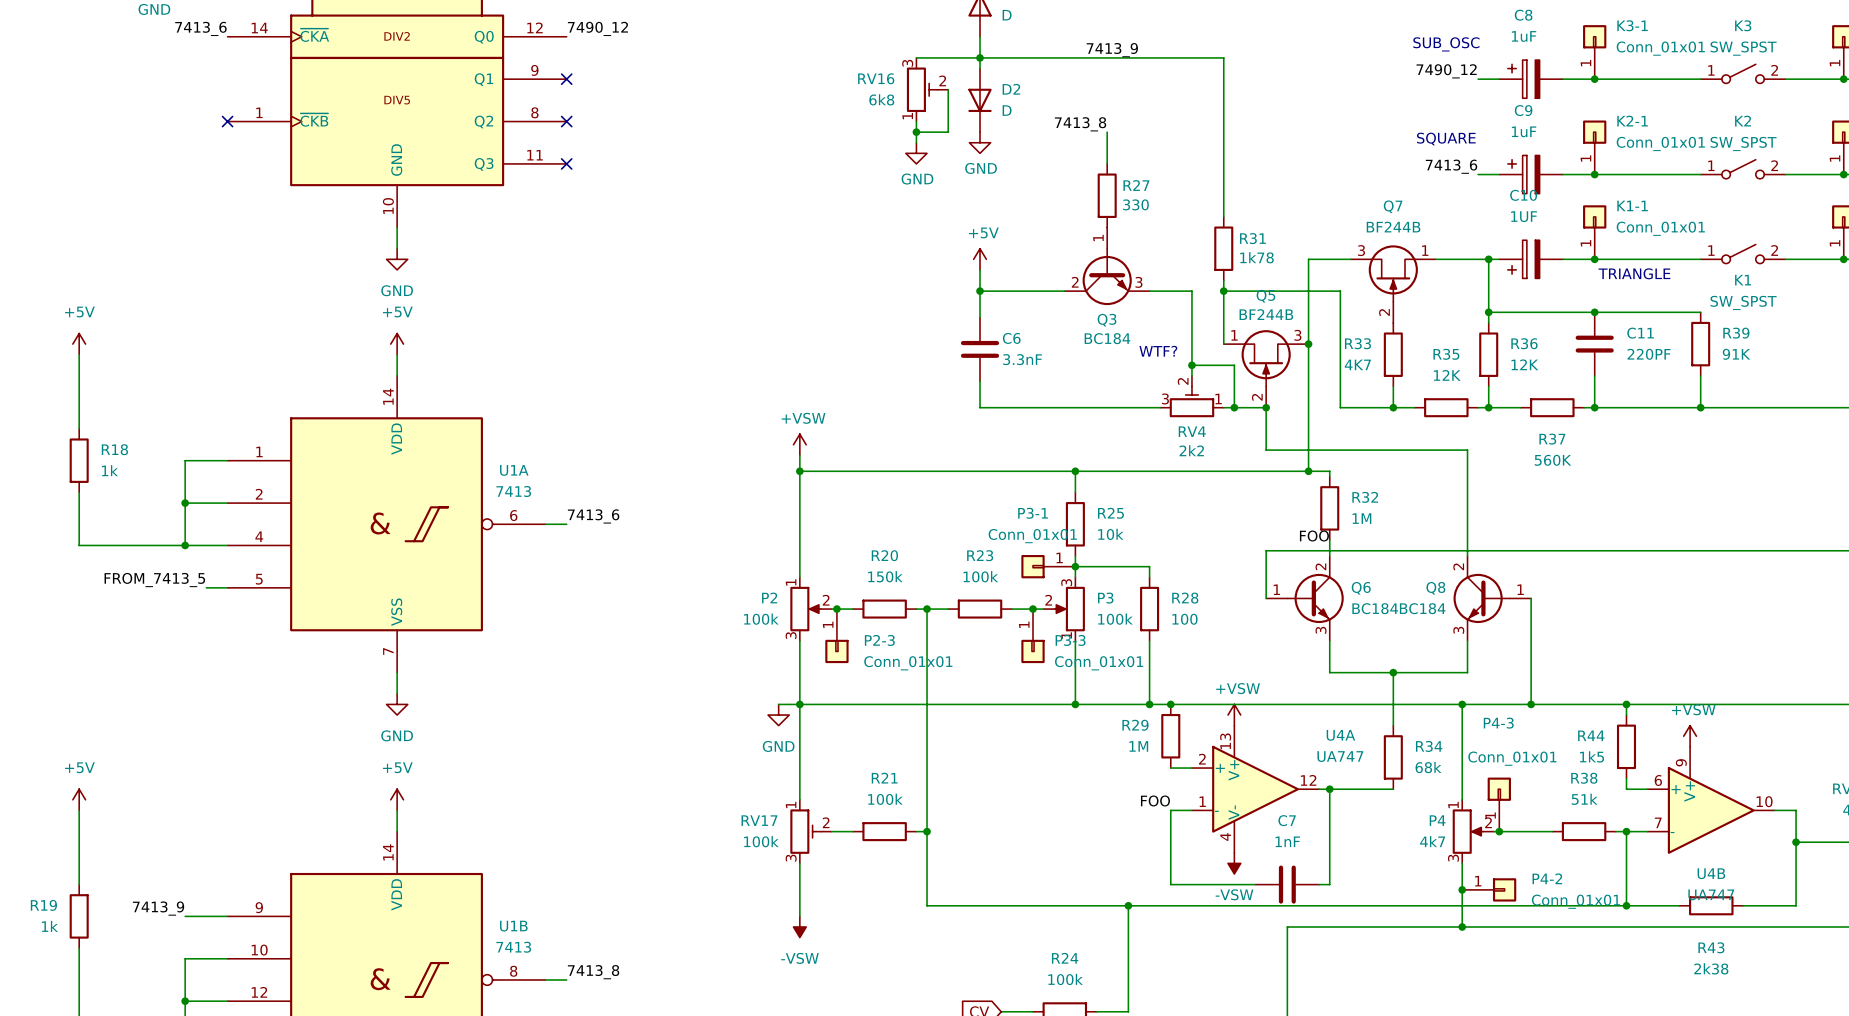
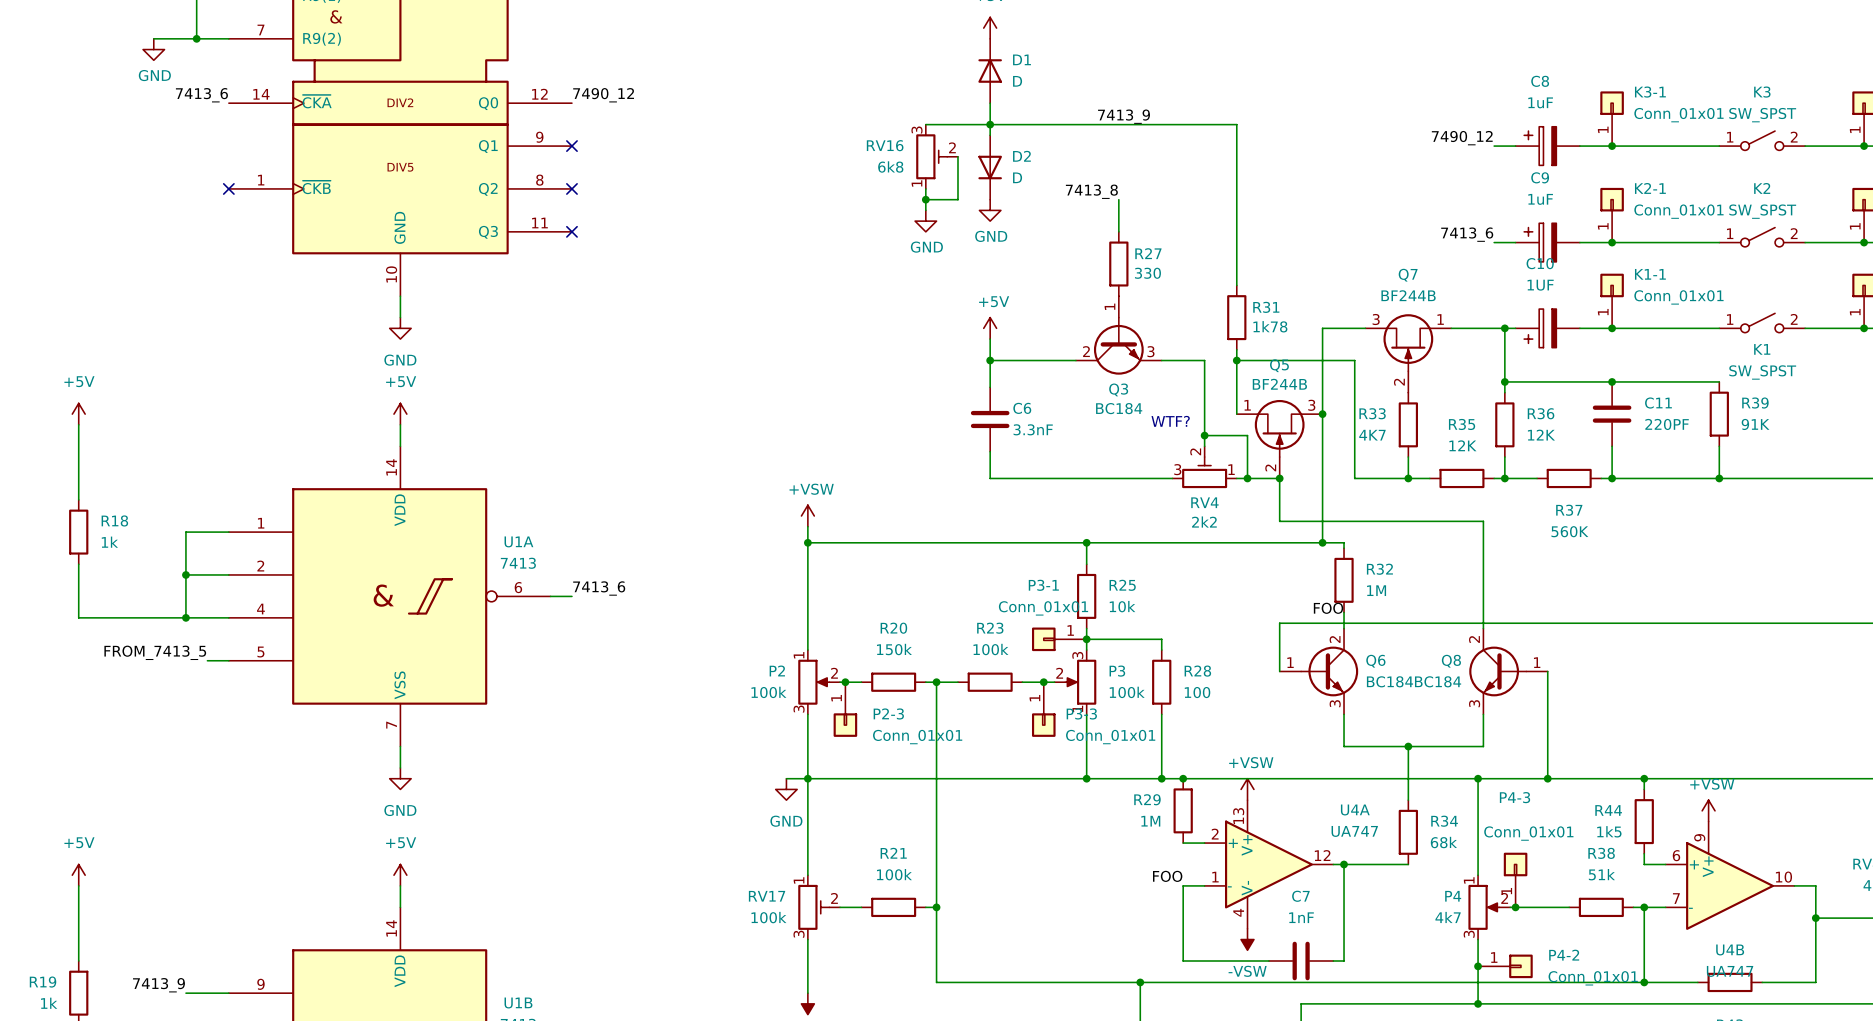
text: SUB_OSC (1446, 44) -> none
text: SQUARE (1446, 138) -> none
text: TRIANGLE (1634, 273) -> none

